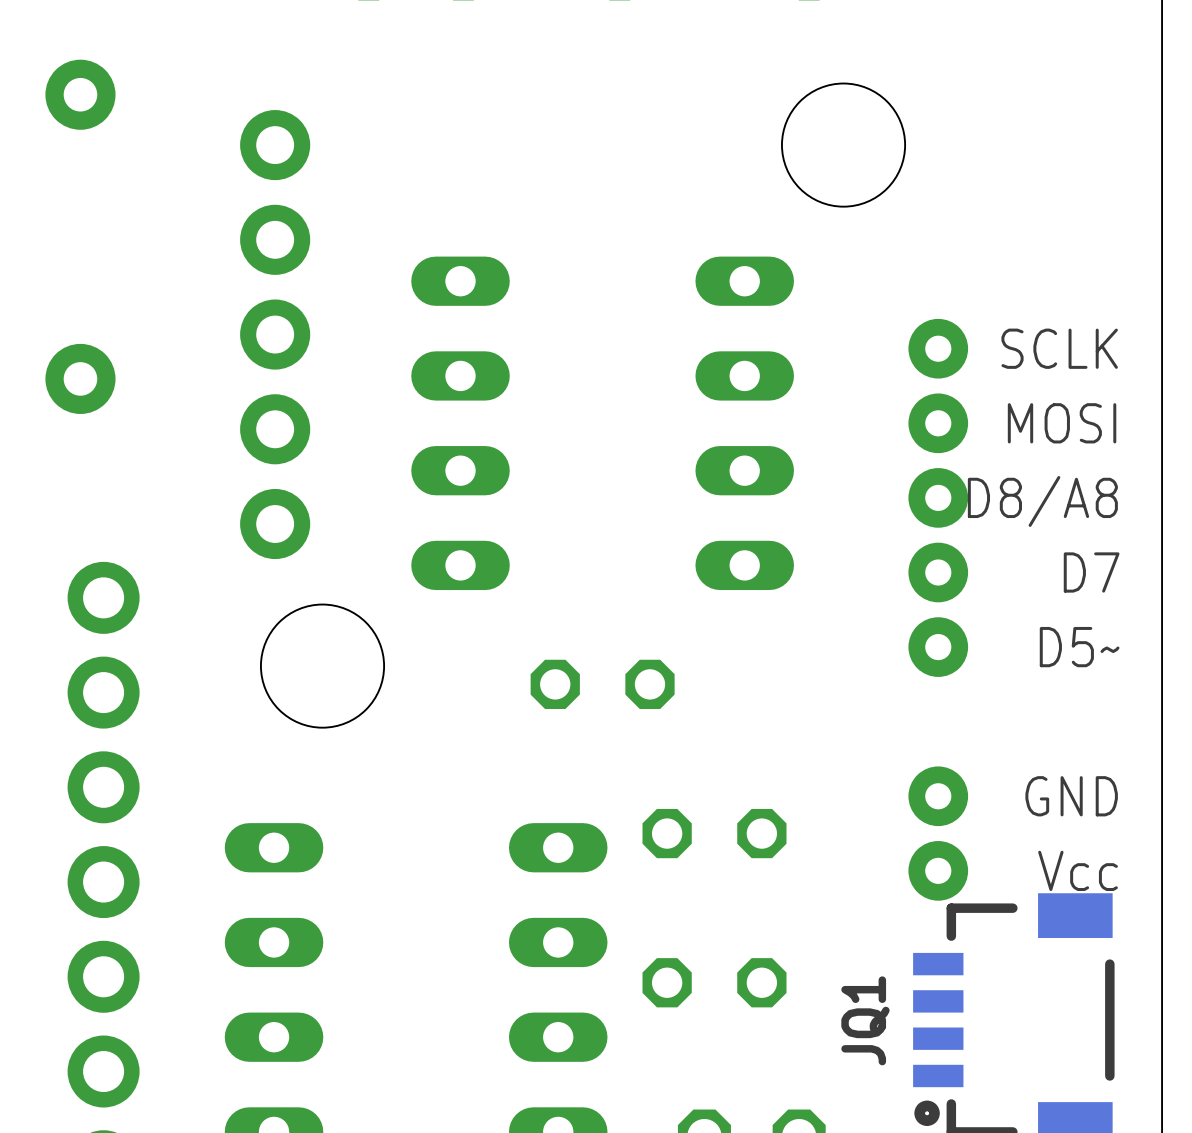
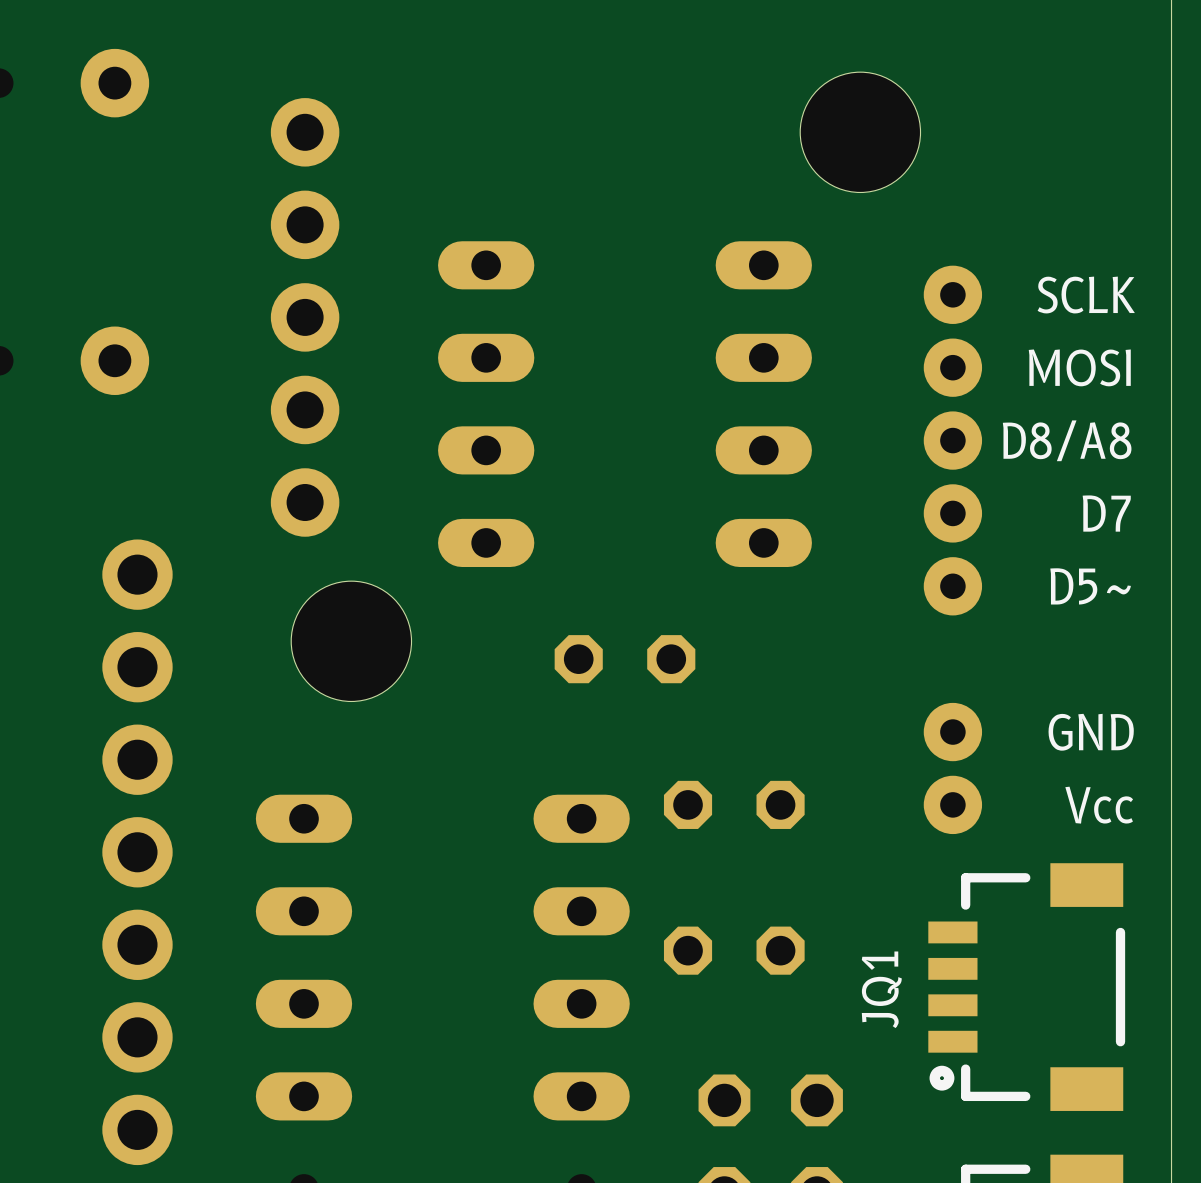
text position: SCLK (1059, 348) -> SCLK (1086, 295)
text position: MOSI (1062, 423) -> MOSI (1079, 367)
part position: (938, 497) -> (952, 440)
text position: D8/A8 (1042, 501) -> D8/A8 (1067, 440)
text position: D7 (1091, 572) -> D7 (1106, 513)
text position: D5~ (1079, 647) -> D5~ (1090, 586)
text position: GND (1071, 796) -> GND (1091, 732)
part position: (938, 833) -> (952, 768)
text position: Vcc (1078, 870) -> Vcc (1099, 805)

